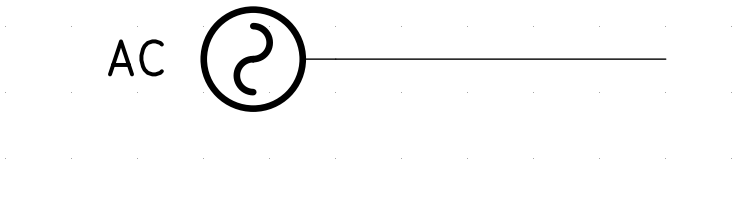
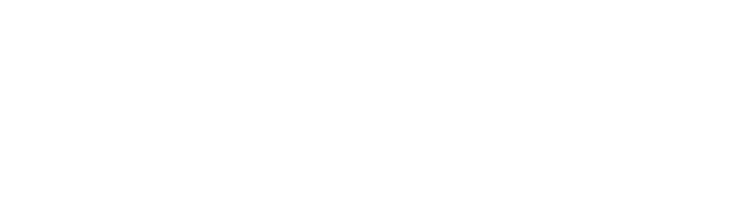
power symbol: AC (268, 59) -> none
wire: (335, 59) (665, 59) -> none

